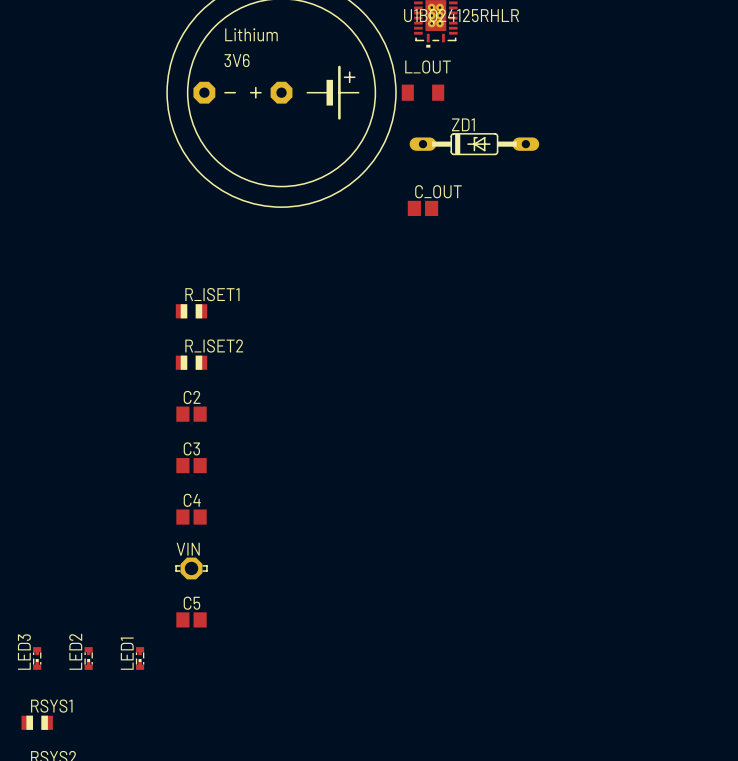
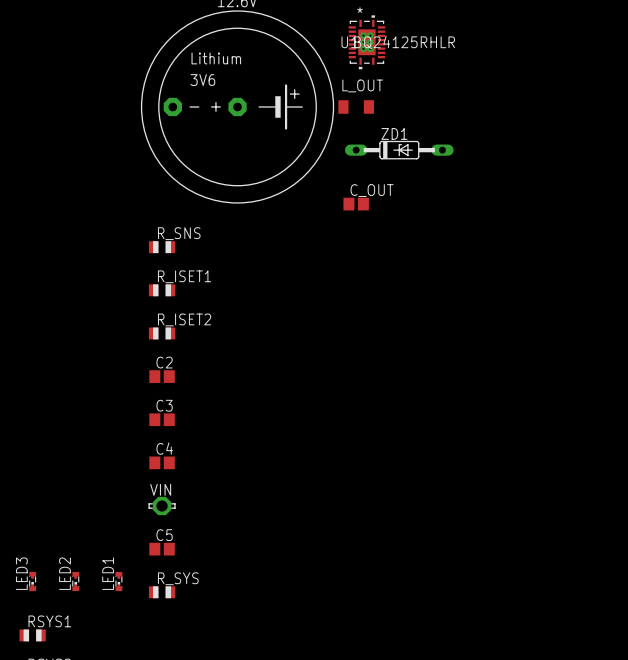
R_SNS: none -> (162, 247)
R_SYS: none -> (162, 592)

